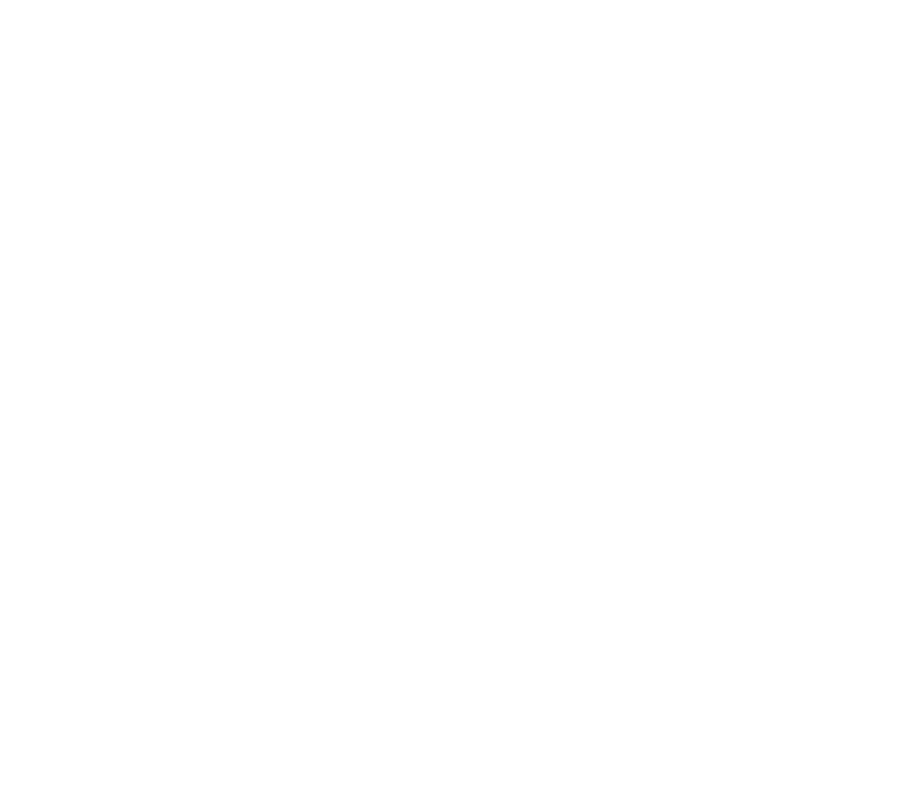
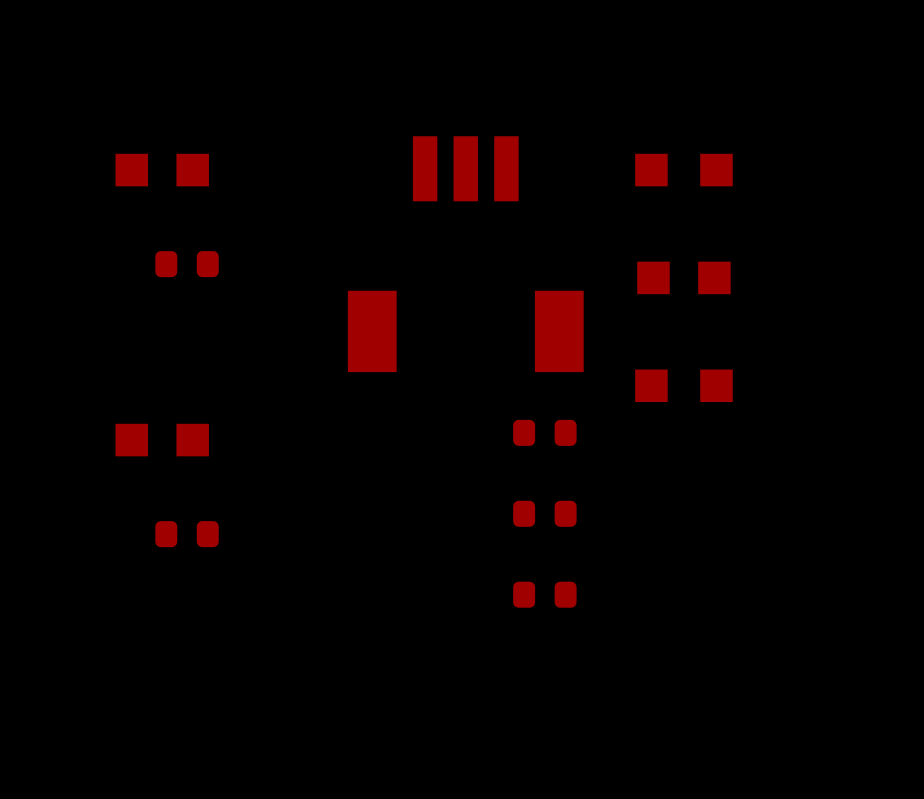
part: none -> (162, 170)
part: none -> (683, 170)
part: none -> (465, 254)
part: none -> (187, 264)
part: none -> (683, 277)
part: none -> (683, 385)
part: none -> (544, 432)
part: none -> (162, 440)
part: none -> (544, 513)
part: none -> (187, 534)
part: none -> (544, 594)

